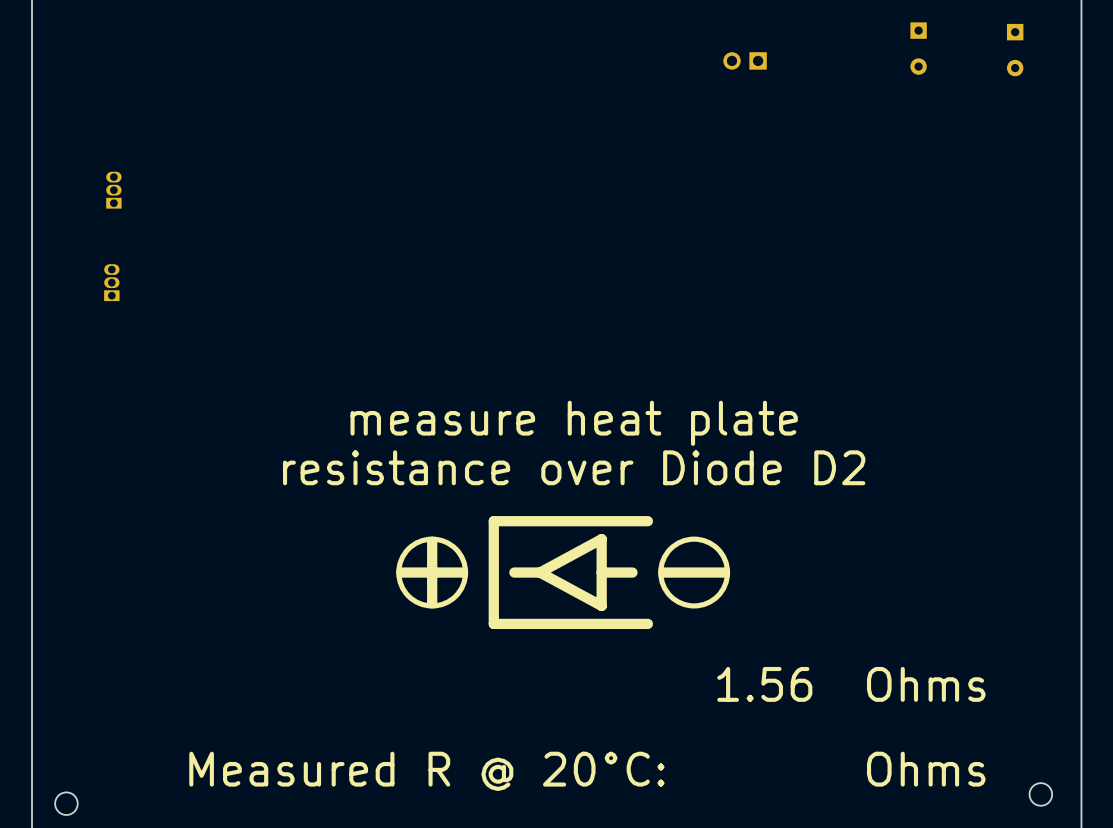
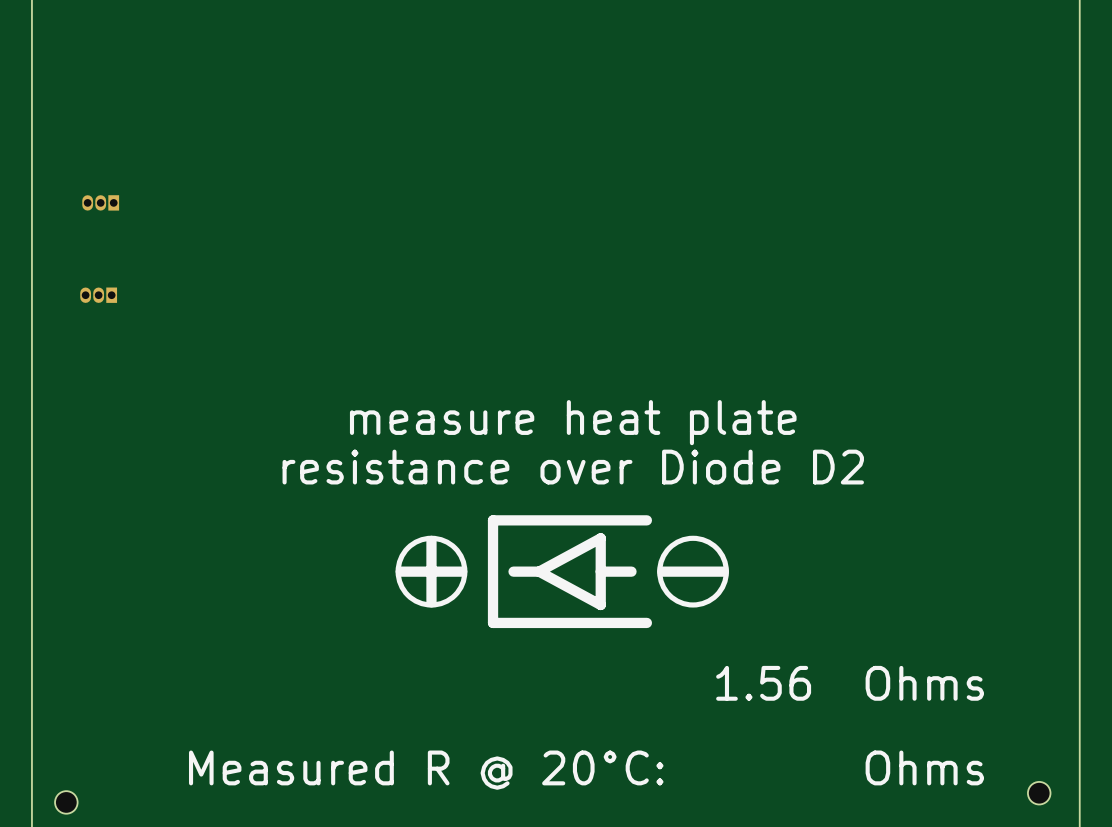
part: (918, 48) -> none
part: (1015, 50) -> none
part: (745, 60) -> none
part rotation: 0° (113, 190) -> 90° counterclockwise (100, 202)
part rotation: 0° (111, 282) -> 90° counterclockwise (98, 295)

